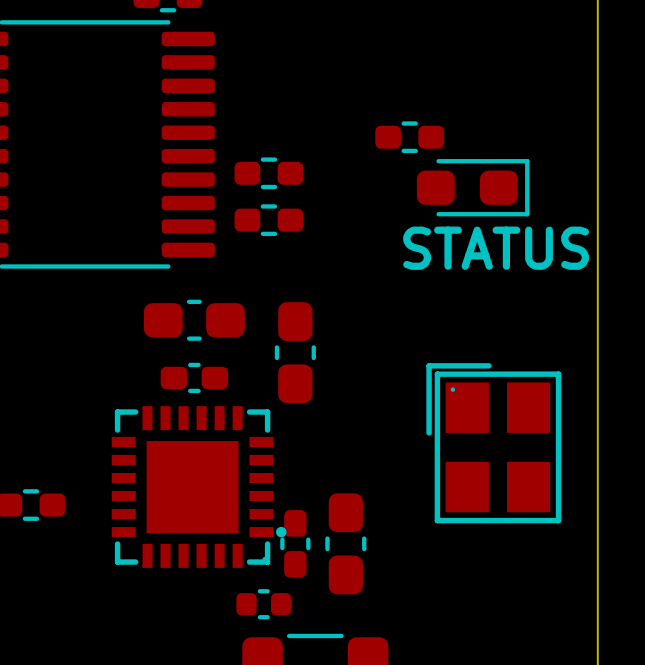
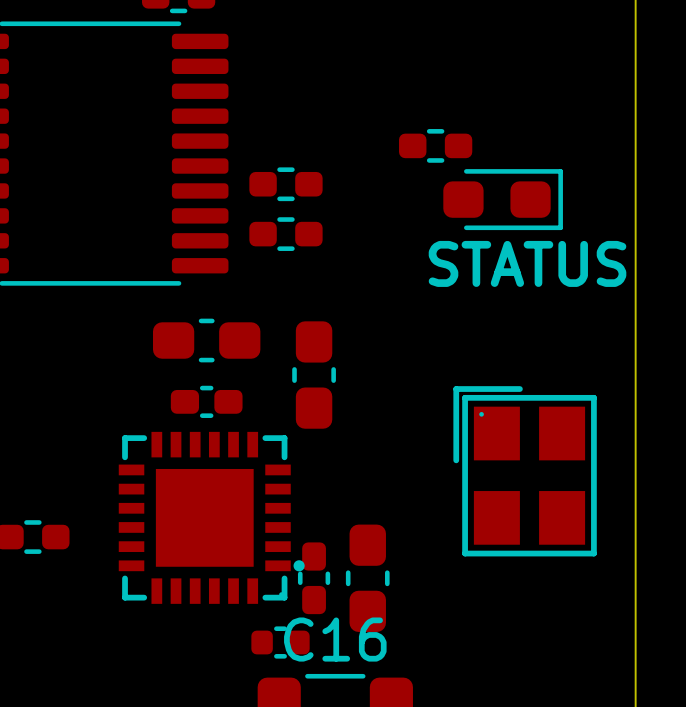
C16 name: none -> C16 (335, 639)

